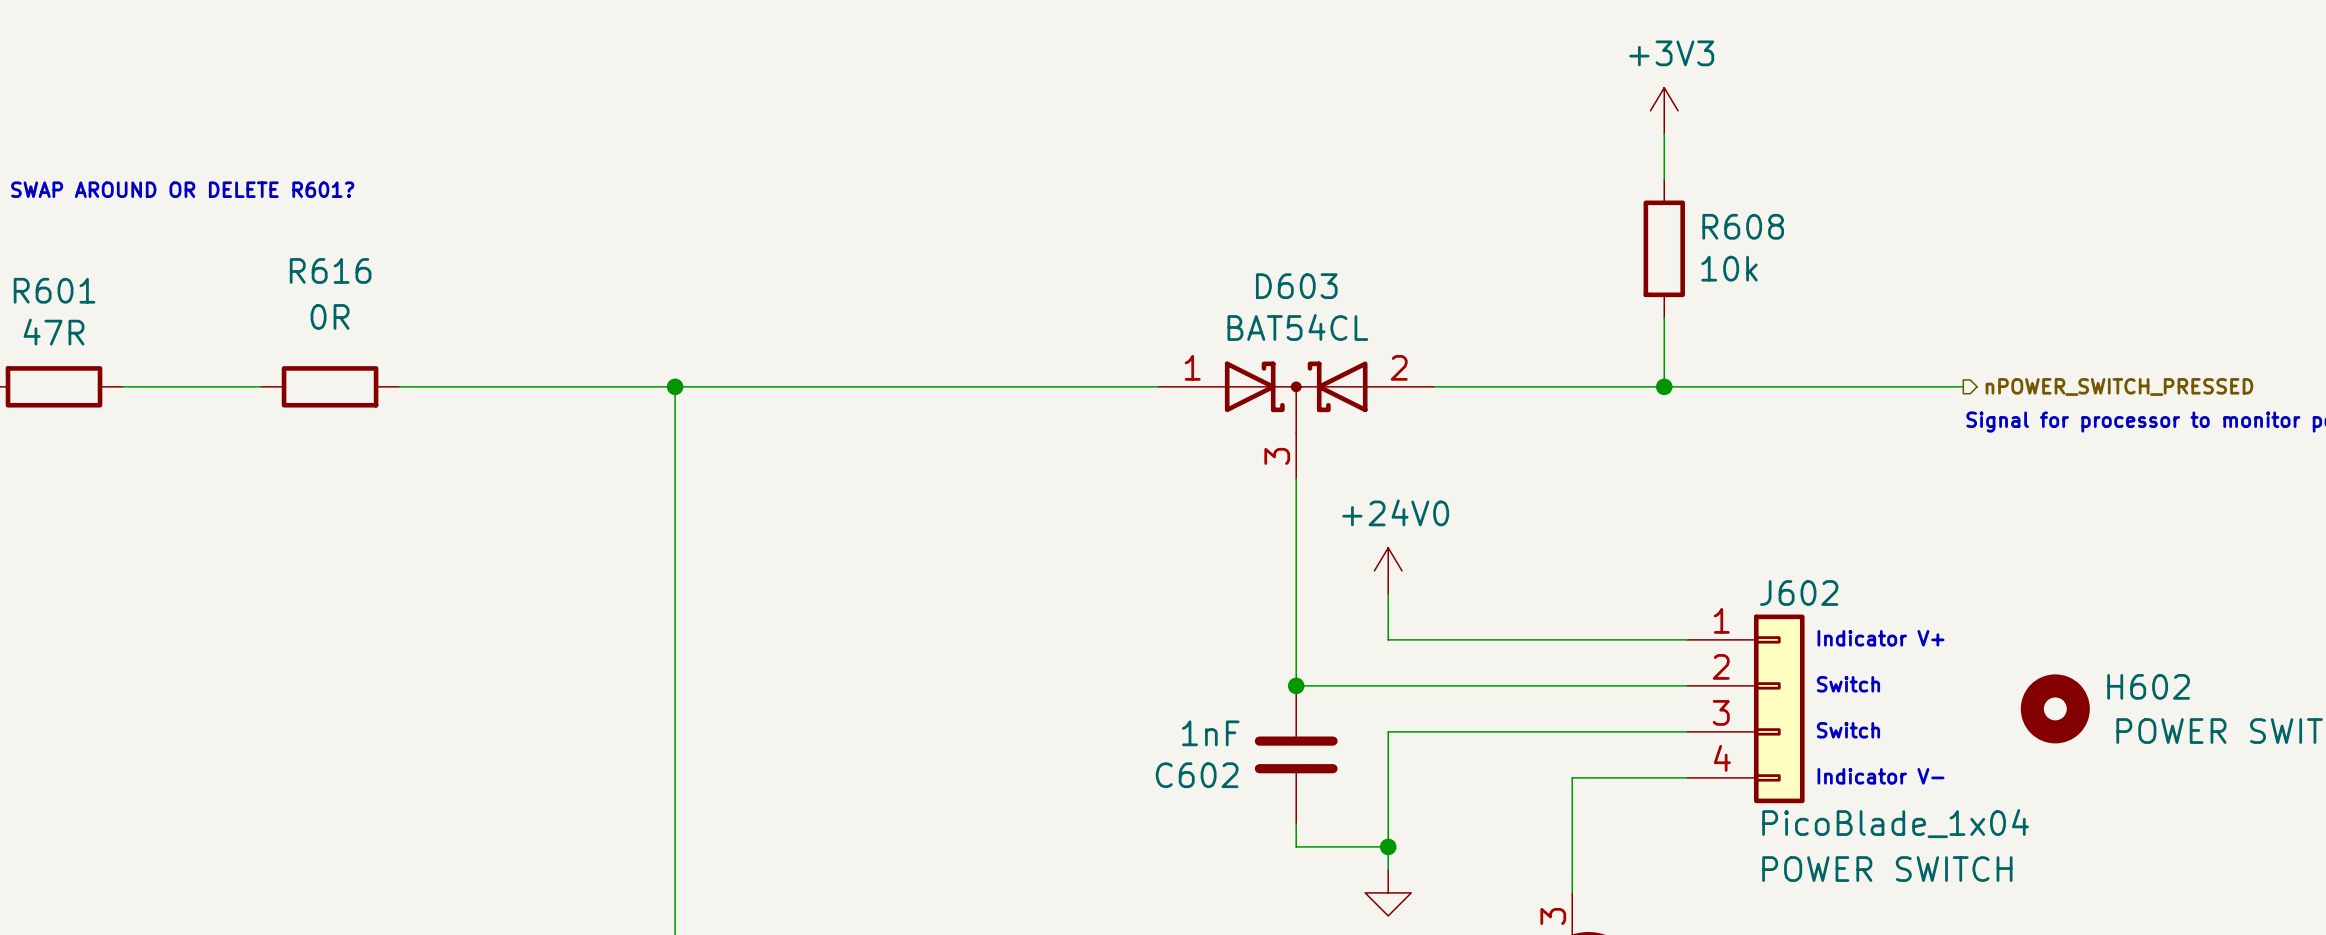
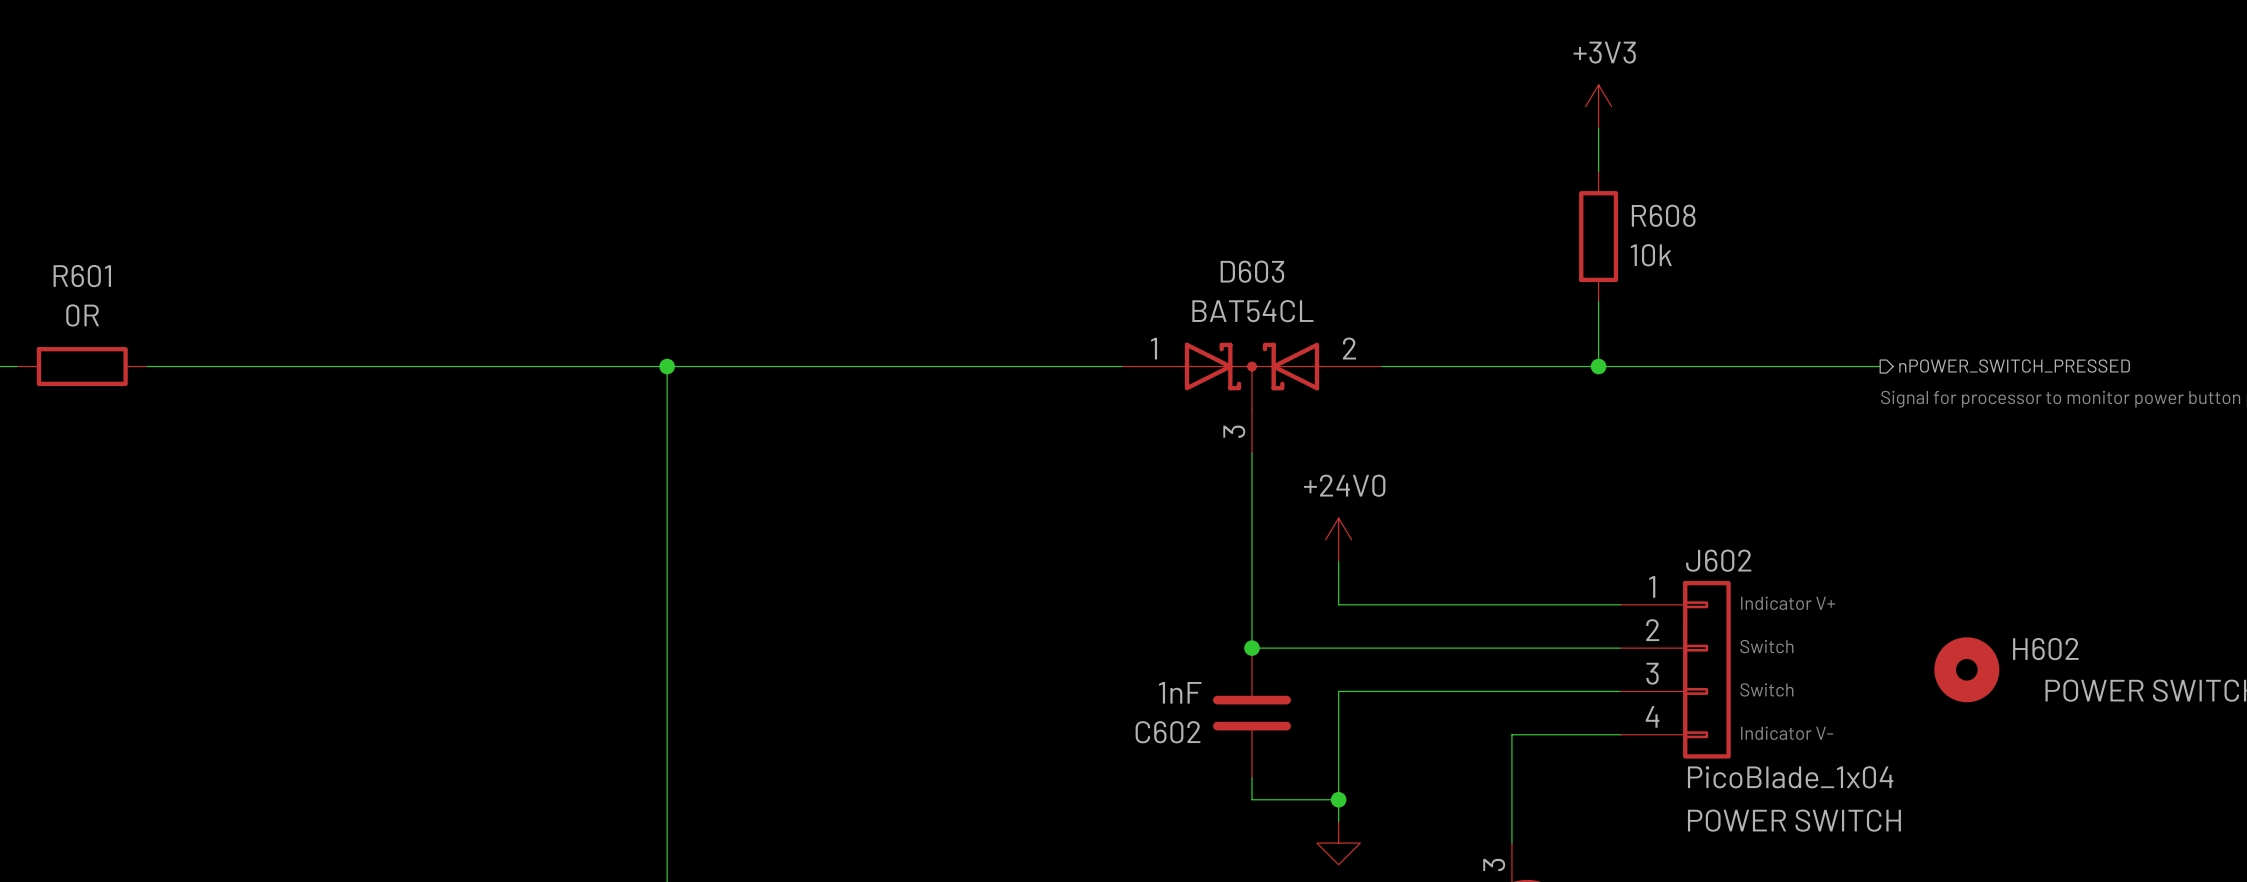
text: SWAP AROUND OR DELETE R601? (182, 189) -> none
R601 value: 47R (54, 332) -> 0R (82, 315)
wire: none -> (277, 366) (407, 366)
R616: 0R (330, 386) -> none

